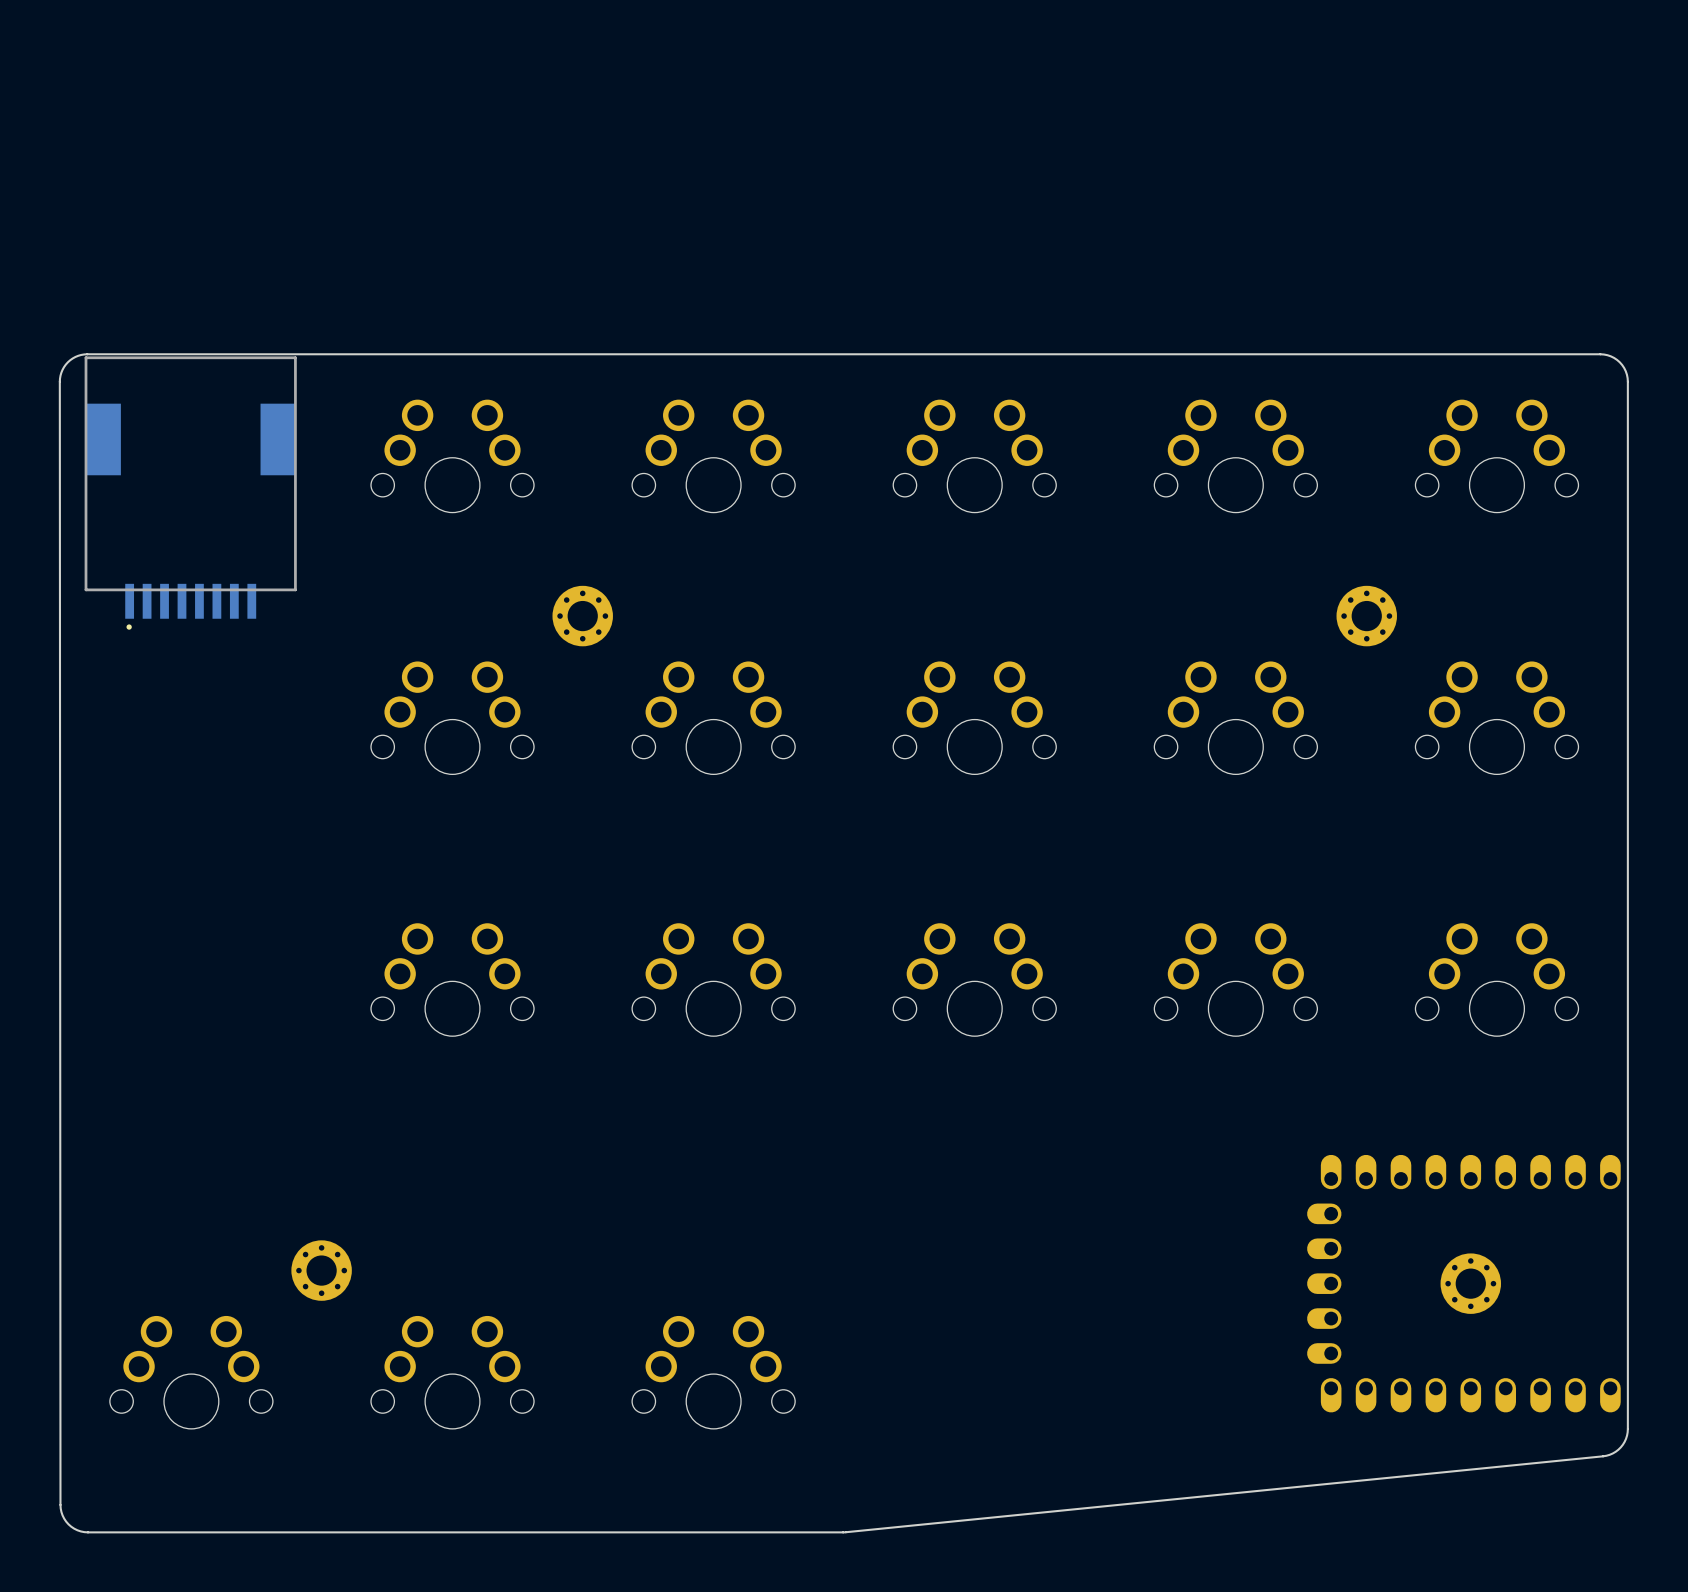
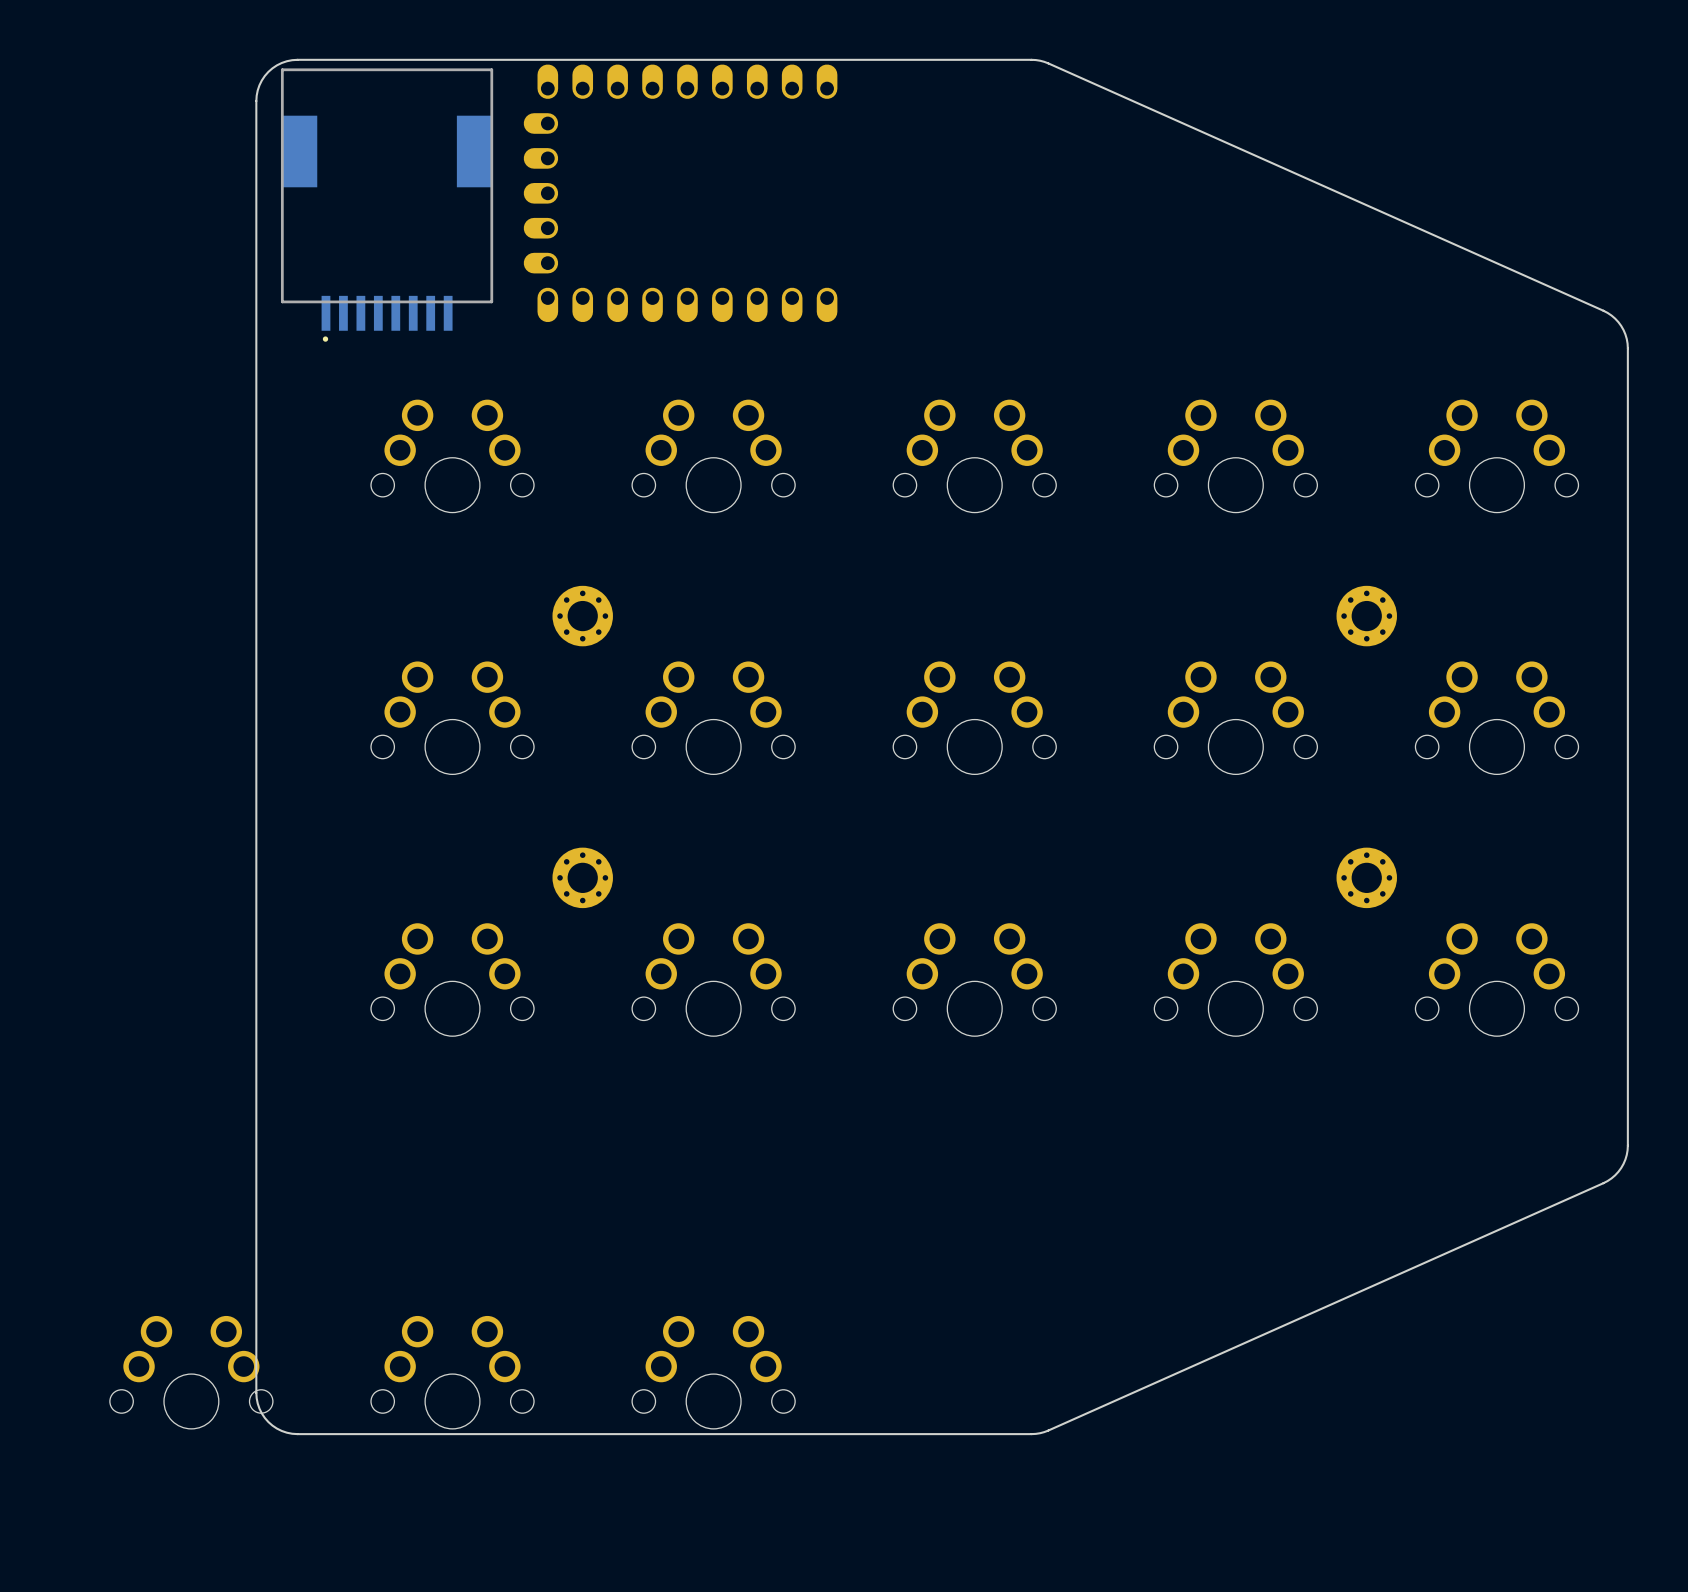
part: none -> (680, 193)
part: none -> (387, 205)
board edge: (1627, 381) (1625, 371) (1619, 362) (1610, 356) (1600, 354) (87, 354) (78, 355) (70, 360) (62, 369) (59, 381) (61, 1512) (71, 1526) (87, 1532) (844, 1532) (1606, 1455) (1620, 1447) (1627, 1432) (1627, 1145) -> (1627, 381) (1626, 338) (1621, 325) (1607, 312) (1040, 60) (297, 59) (281, 62) (272, 68) (264, 75) (257, 90) (256, 1392) (259, 1408) (272, 1425) (281, 1430) (297, 1434) (1040, 1433) (1603, 1183) (1615, 1175) (1621, 1167) (1625, 1159) (1627, 1145)
part: (190, 493) -> none
part: none -> (582, 877)
part: none -> (1366, 877)
part: (321, 1270) -> none
part: (1463, 1283) -> none
part: (1470, 1283) -> none

